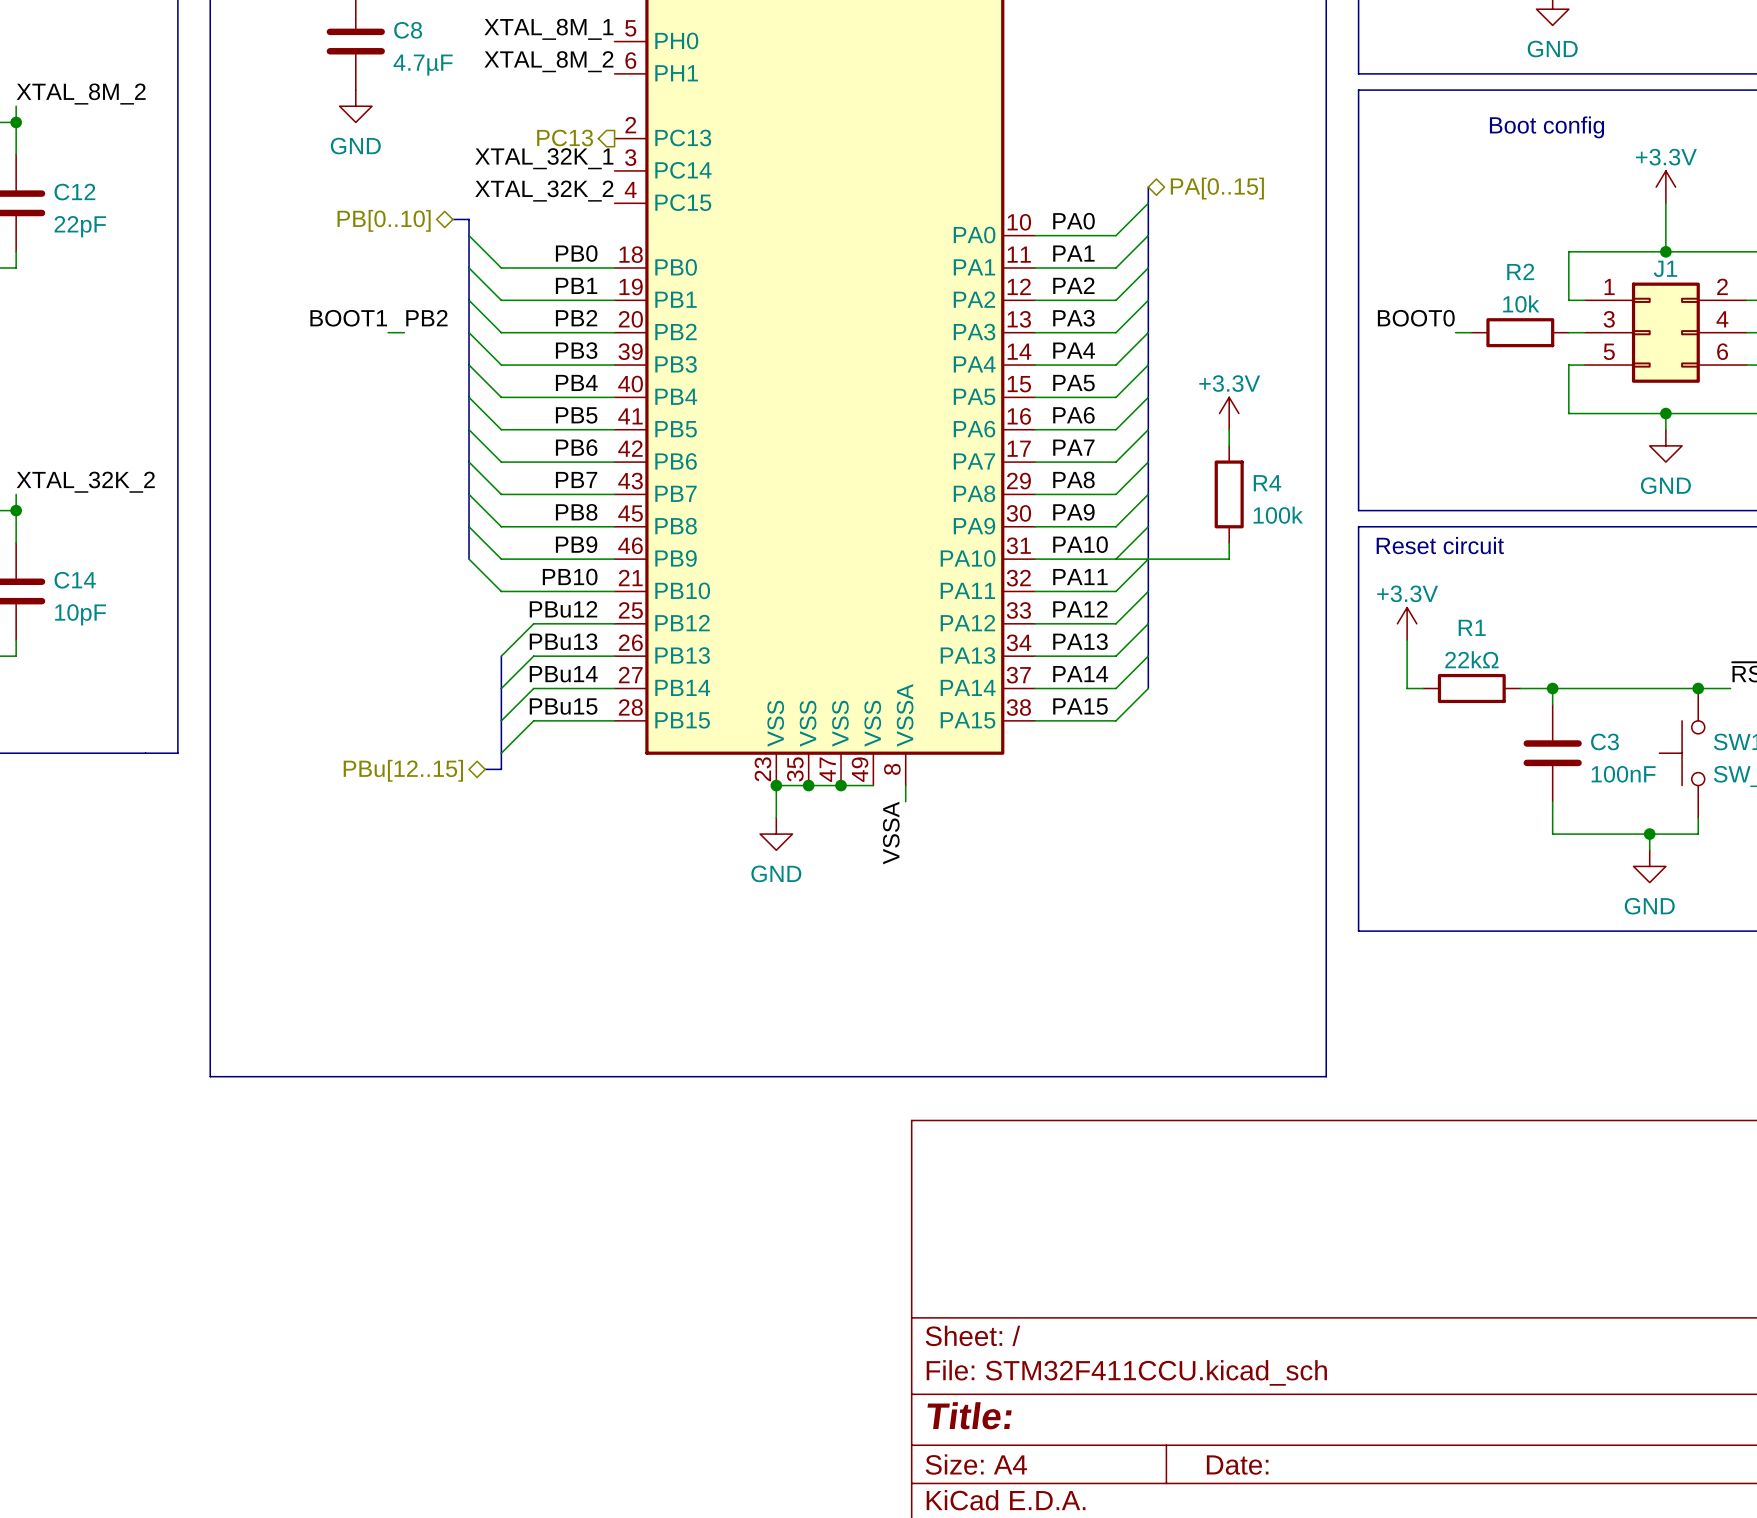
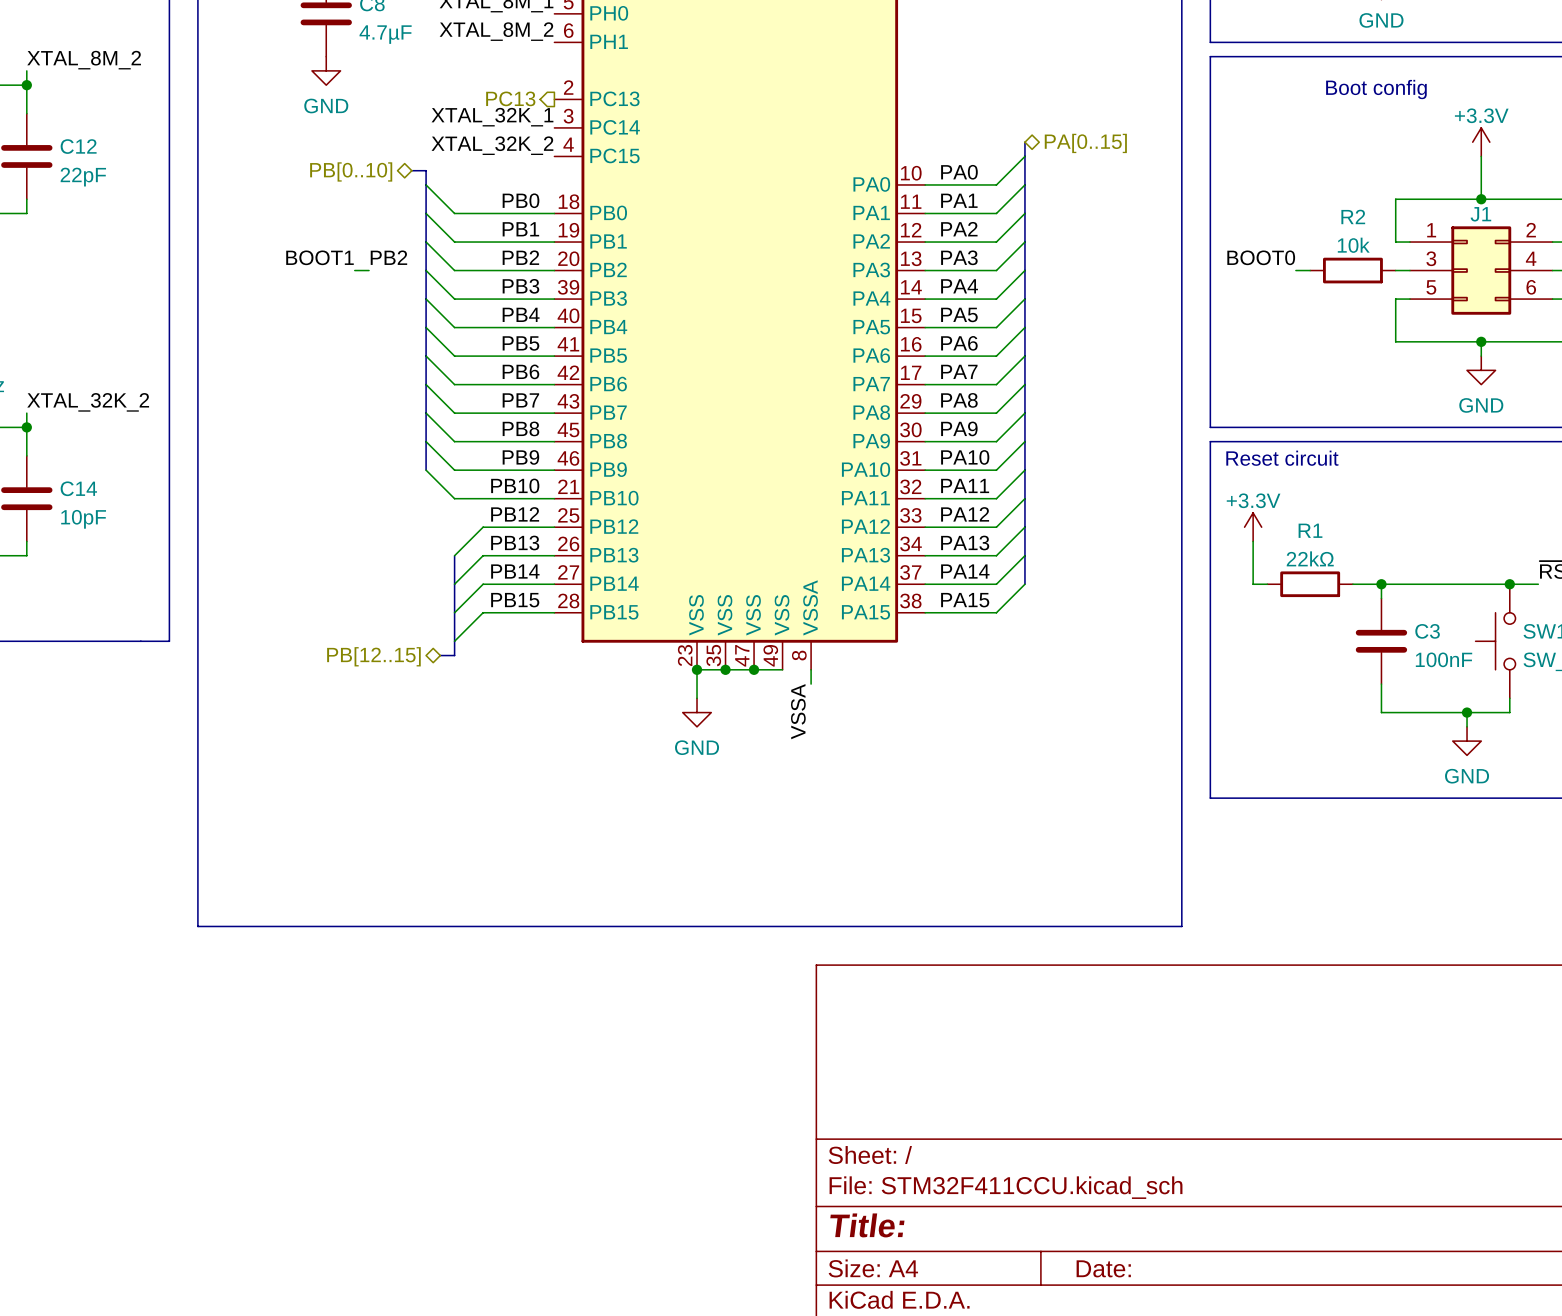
power symbol: +3.3V (1229, 413) -> none
wire: (1229, 429) (1229, 445) -> none
R4: 100k (1229, 494) -> none
wire: (1229, 542) (1229, 559) (1115, 559) -> none
label: PBu12 (563, 609) -> PB12 (515, 514)
label: PBu13 (563, 641) -> PB13 (515, 542)
label: PBu14 (563, 674) -> PB14 (515, 571)
label: PBu15 (563, 706) -> PB15 (515, 600)
hierarchical label: PBu[12..15] (403, 770) -> PB[12..15] (373, 656)

